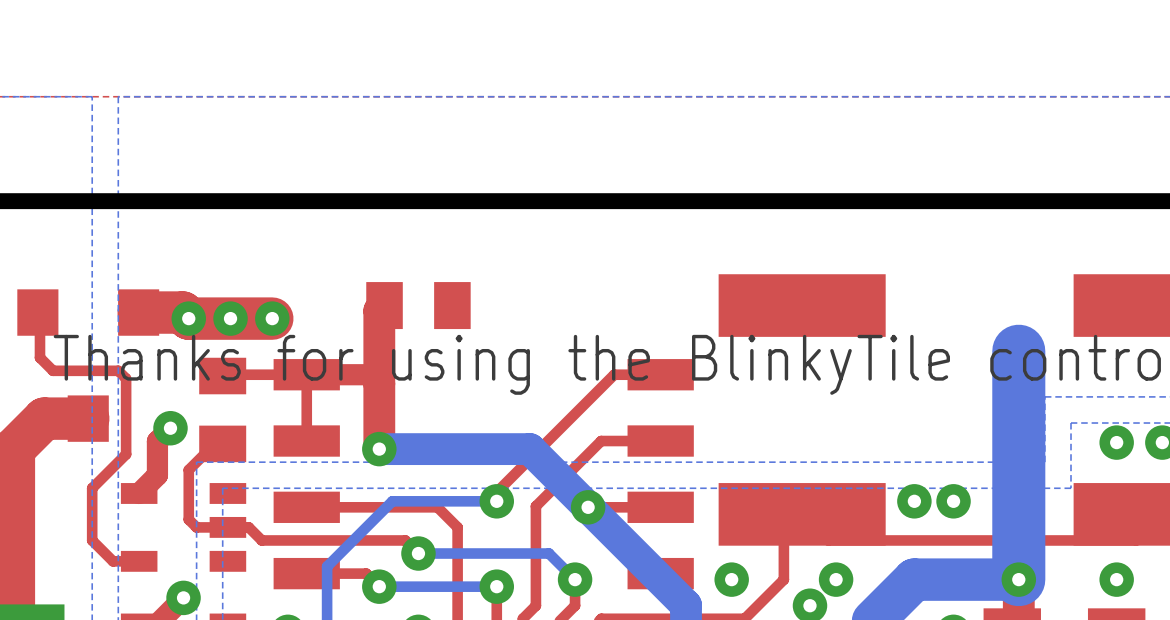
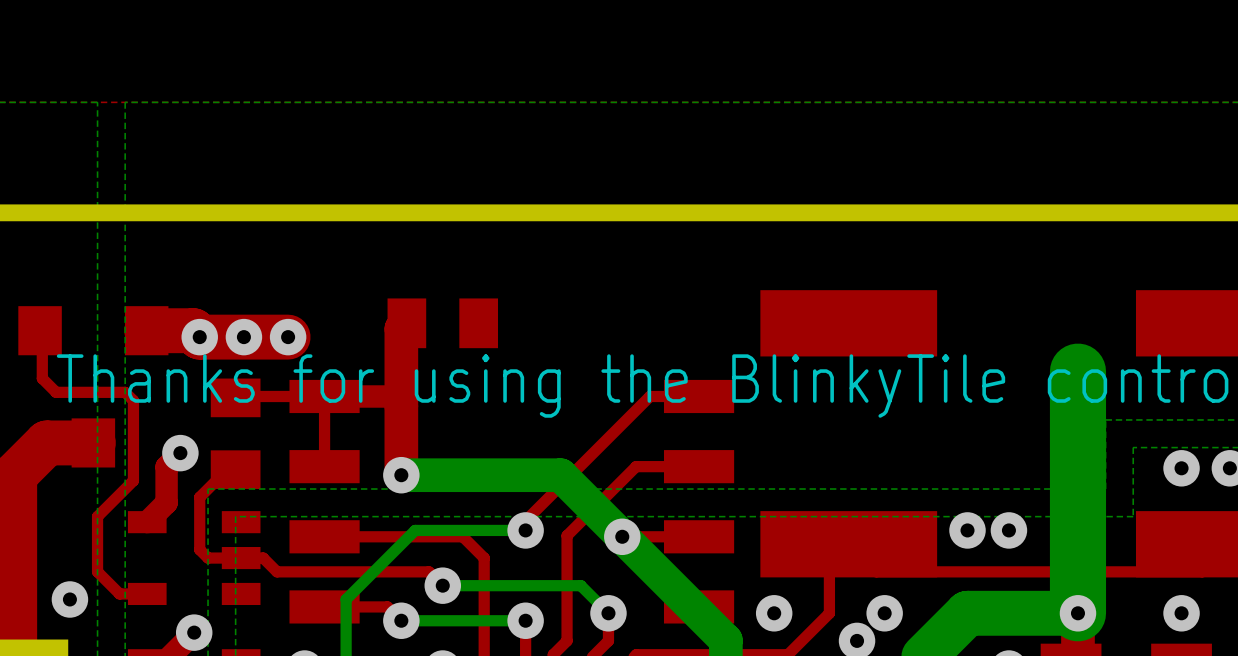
via: none -> (69, 599)

